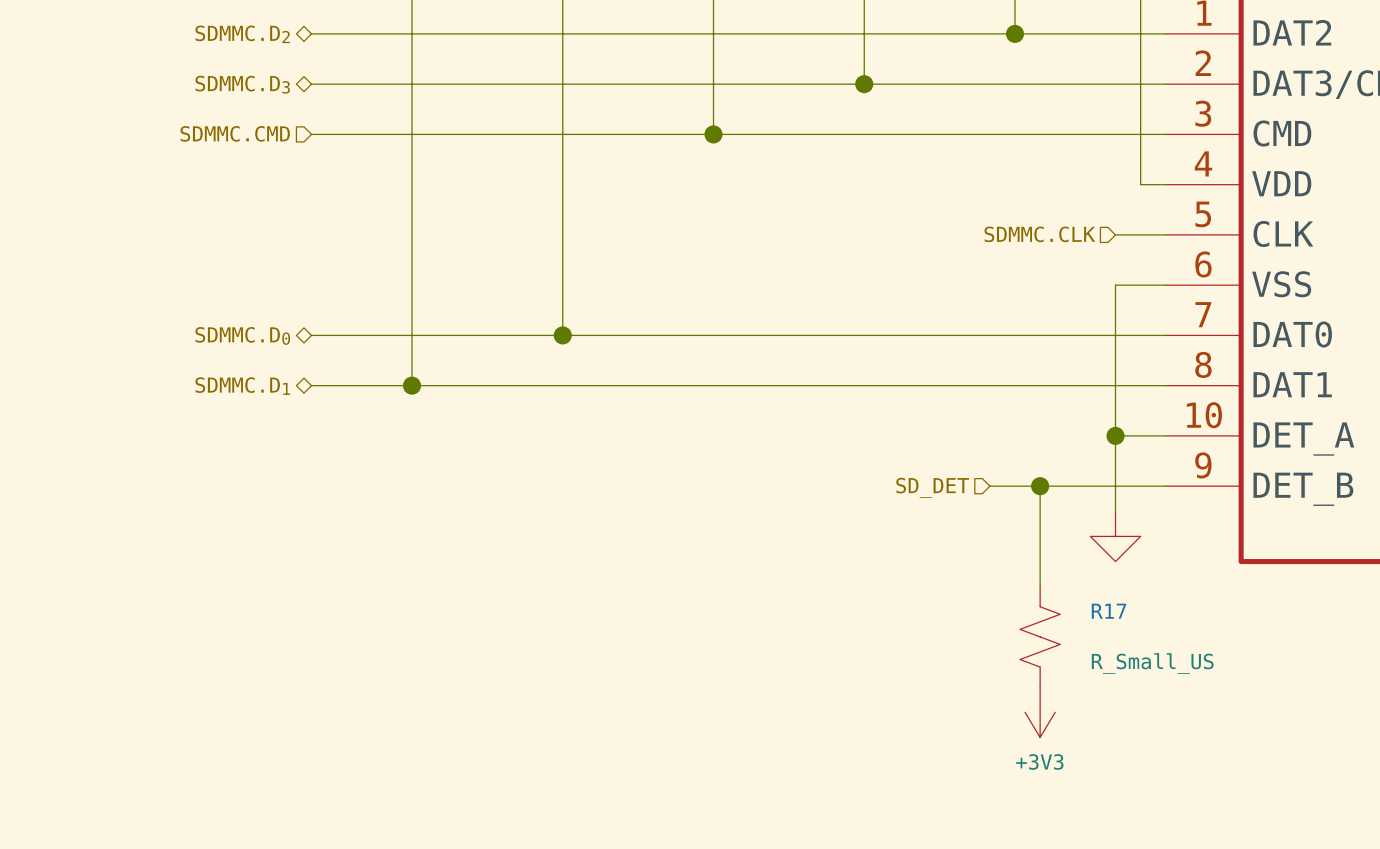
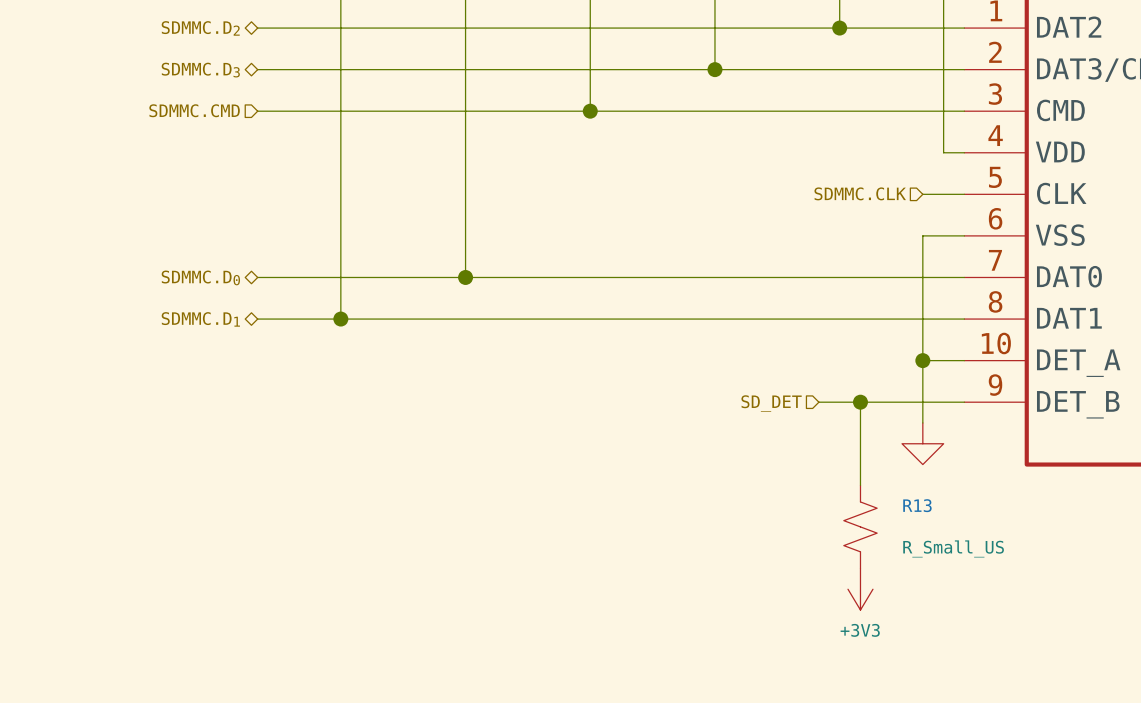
R17 name: R17 (1109, 611) -> R13 (917, 505)

